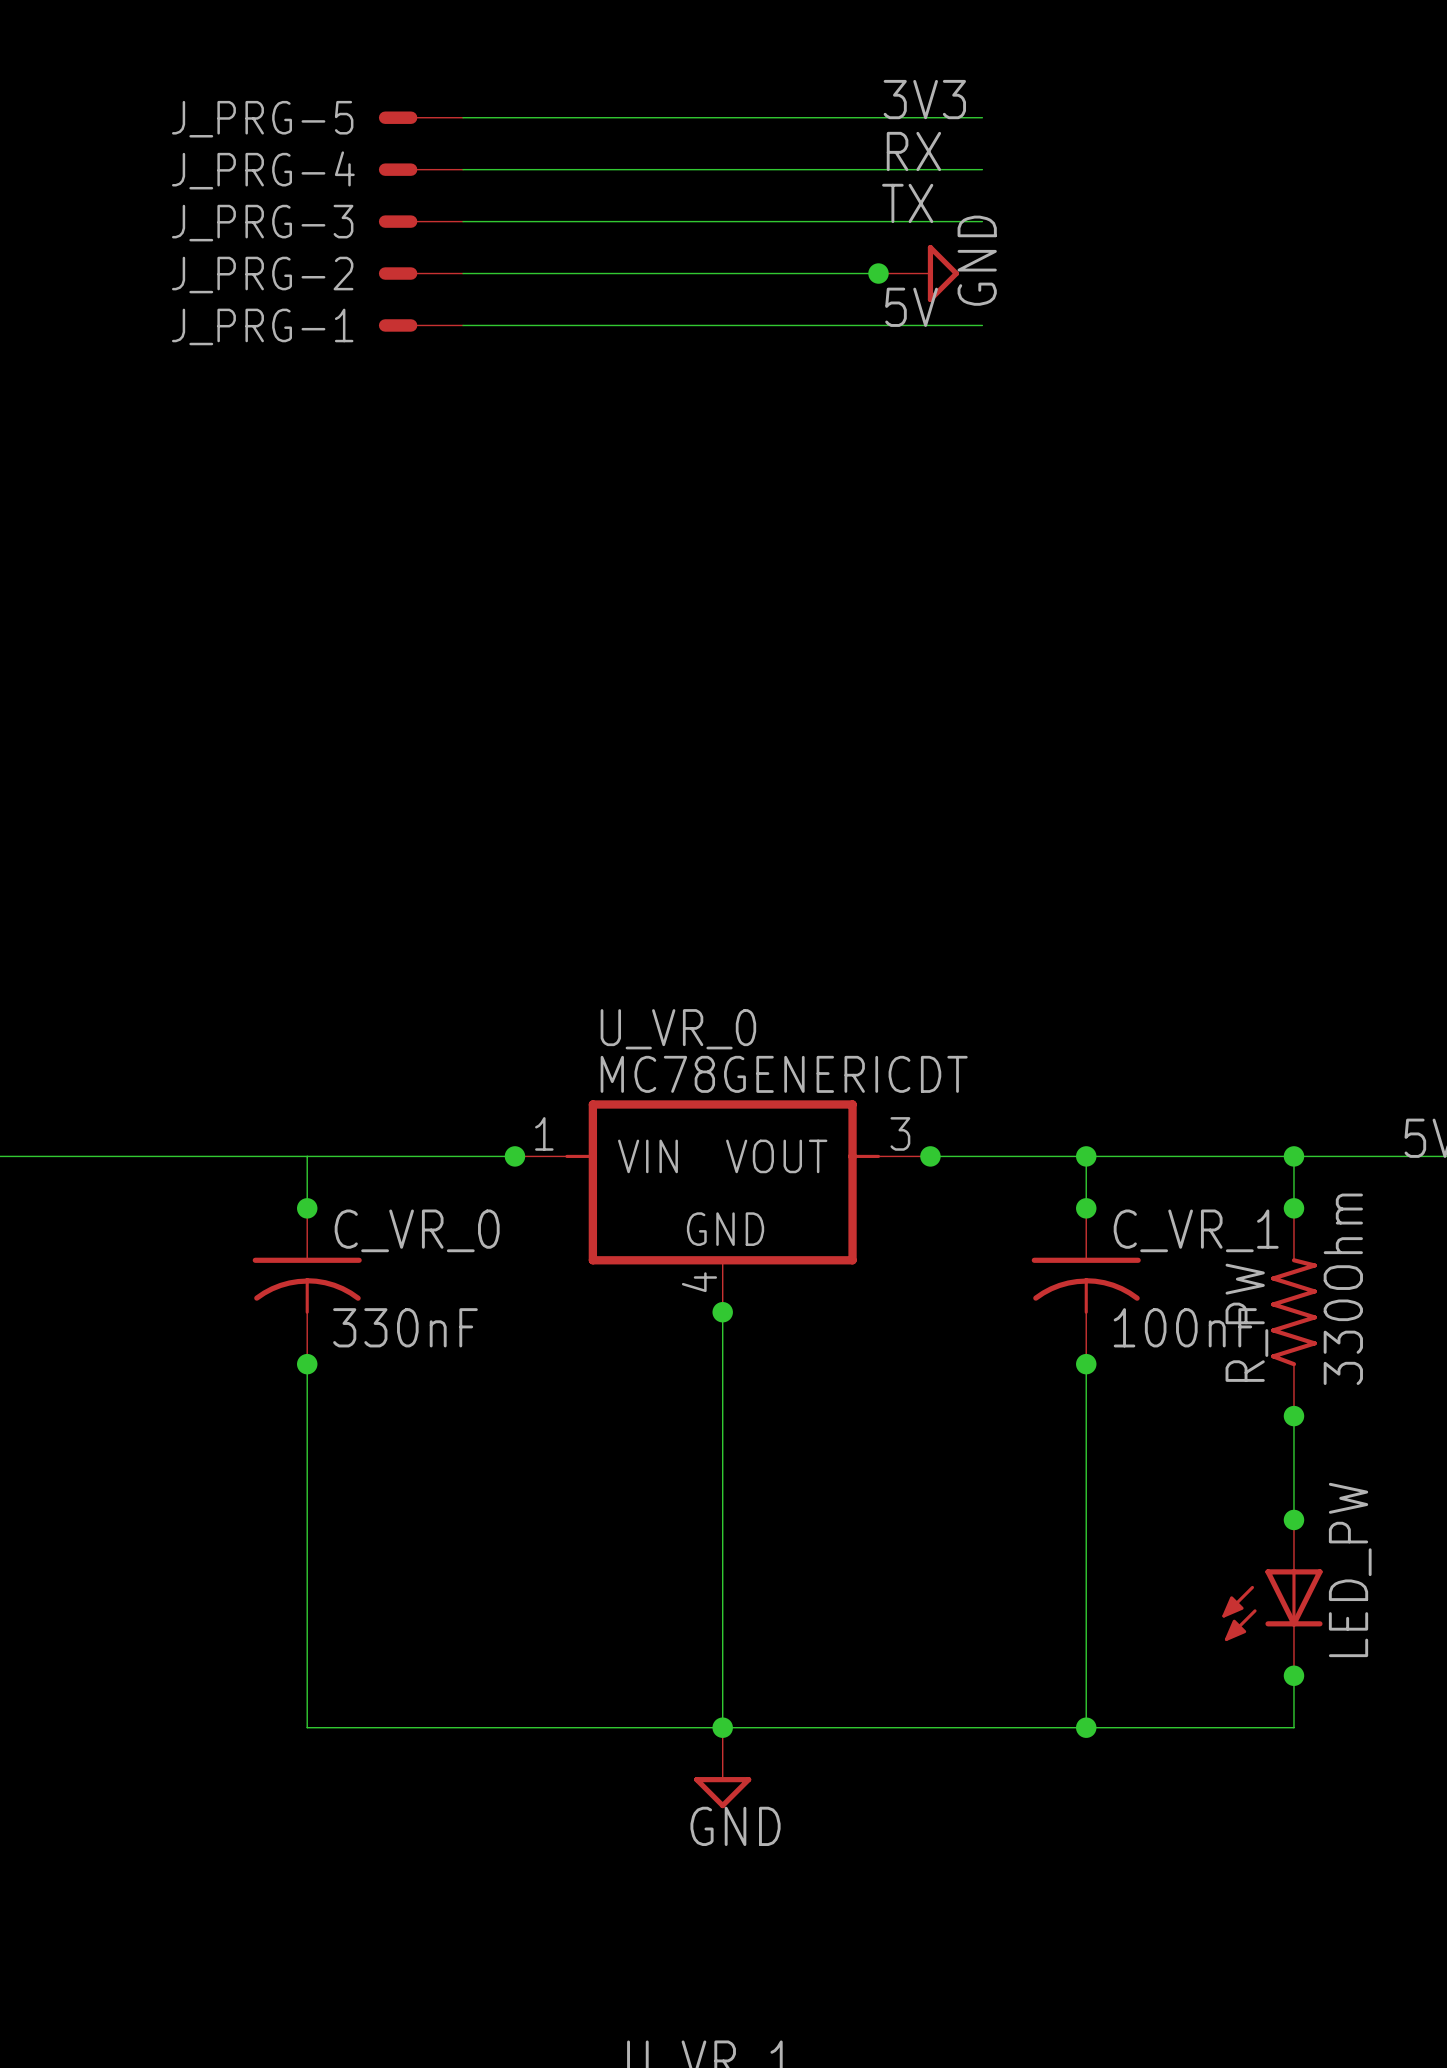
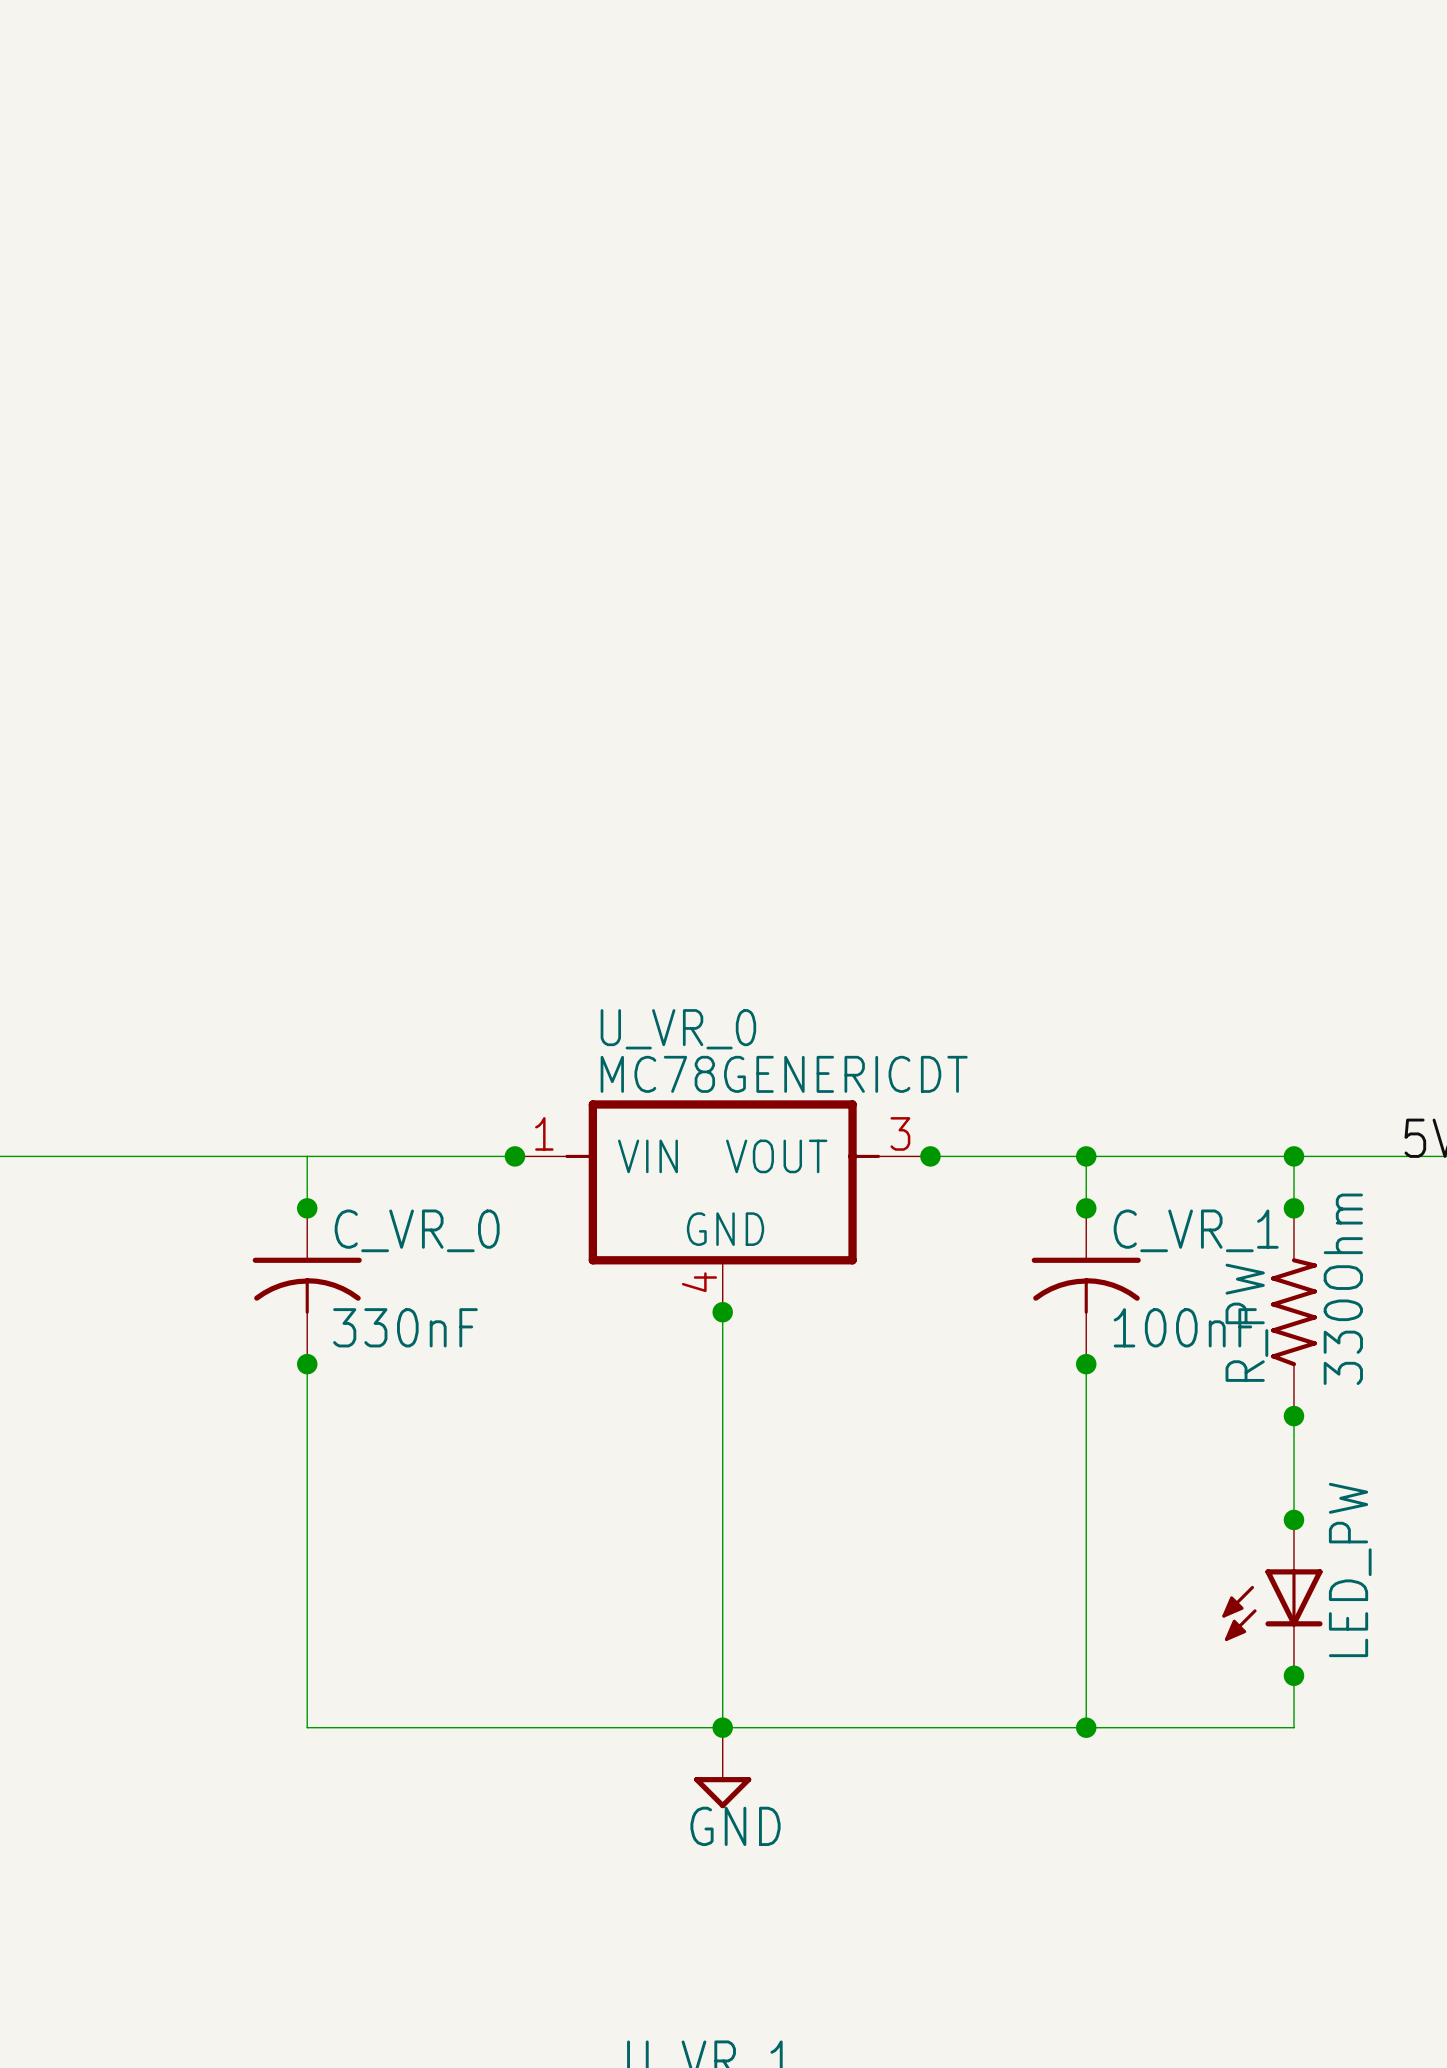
label: 3V3 (924, 99) -> none
J_PRG-5: (420, 117) -> none
wire: (463, 117) (982, 117) -> none
label: RX (913, 151) -> none
J_PRG-4: (420, 169) -> none
wire: (463, 169) (982, 169) -> none
label: TX (907, 203) -> none
J_PRG-3: (420, 221) -> none
wire: (463, 221) (982, 221) -> none
J_PRG-2: (420, 273) -> none
wire: (463, 273) (878, 273) -> none
junction: (878, 273) -> none
power symbol: GND (918, 273) -> none
label: 5V (911, 307) -> none
J_PRG-1: (420, 325) -> none
wire: (463, 325) (982, 325) -> none

